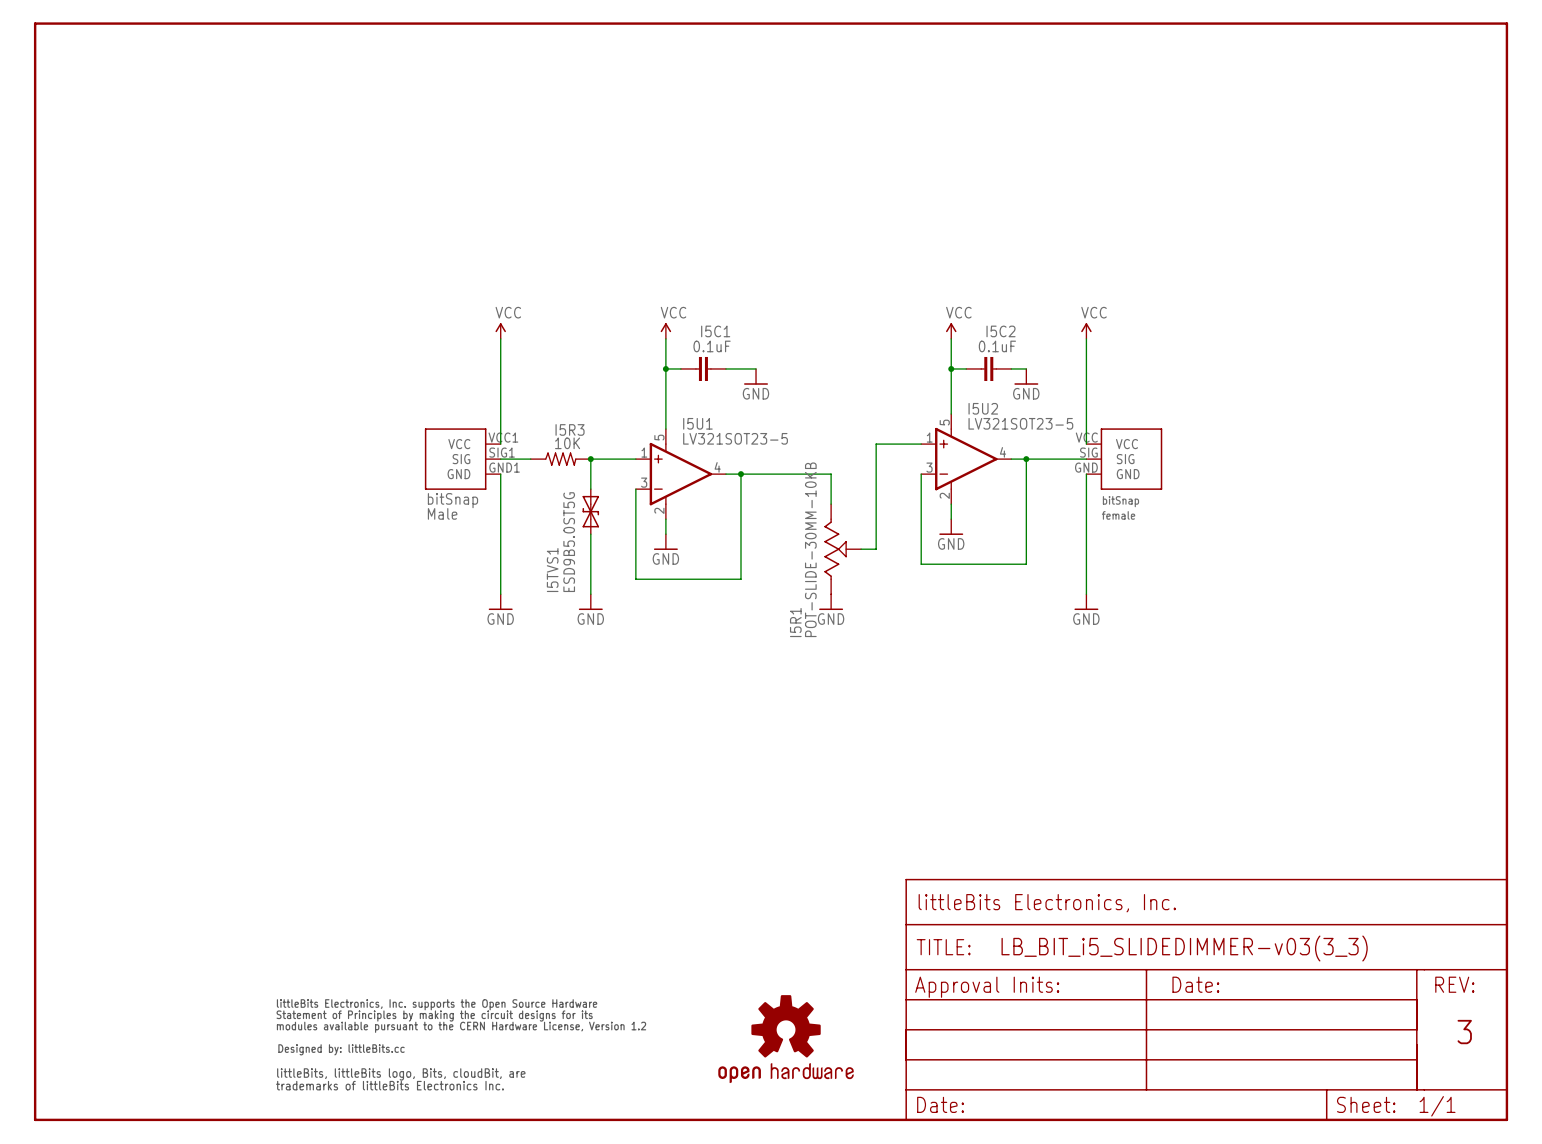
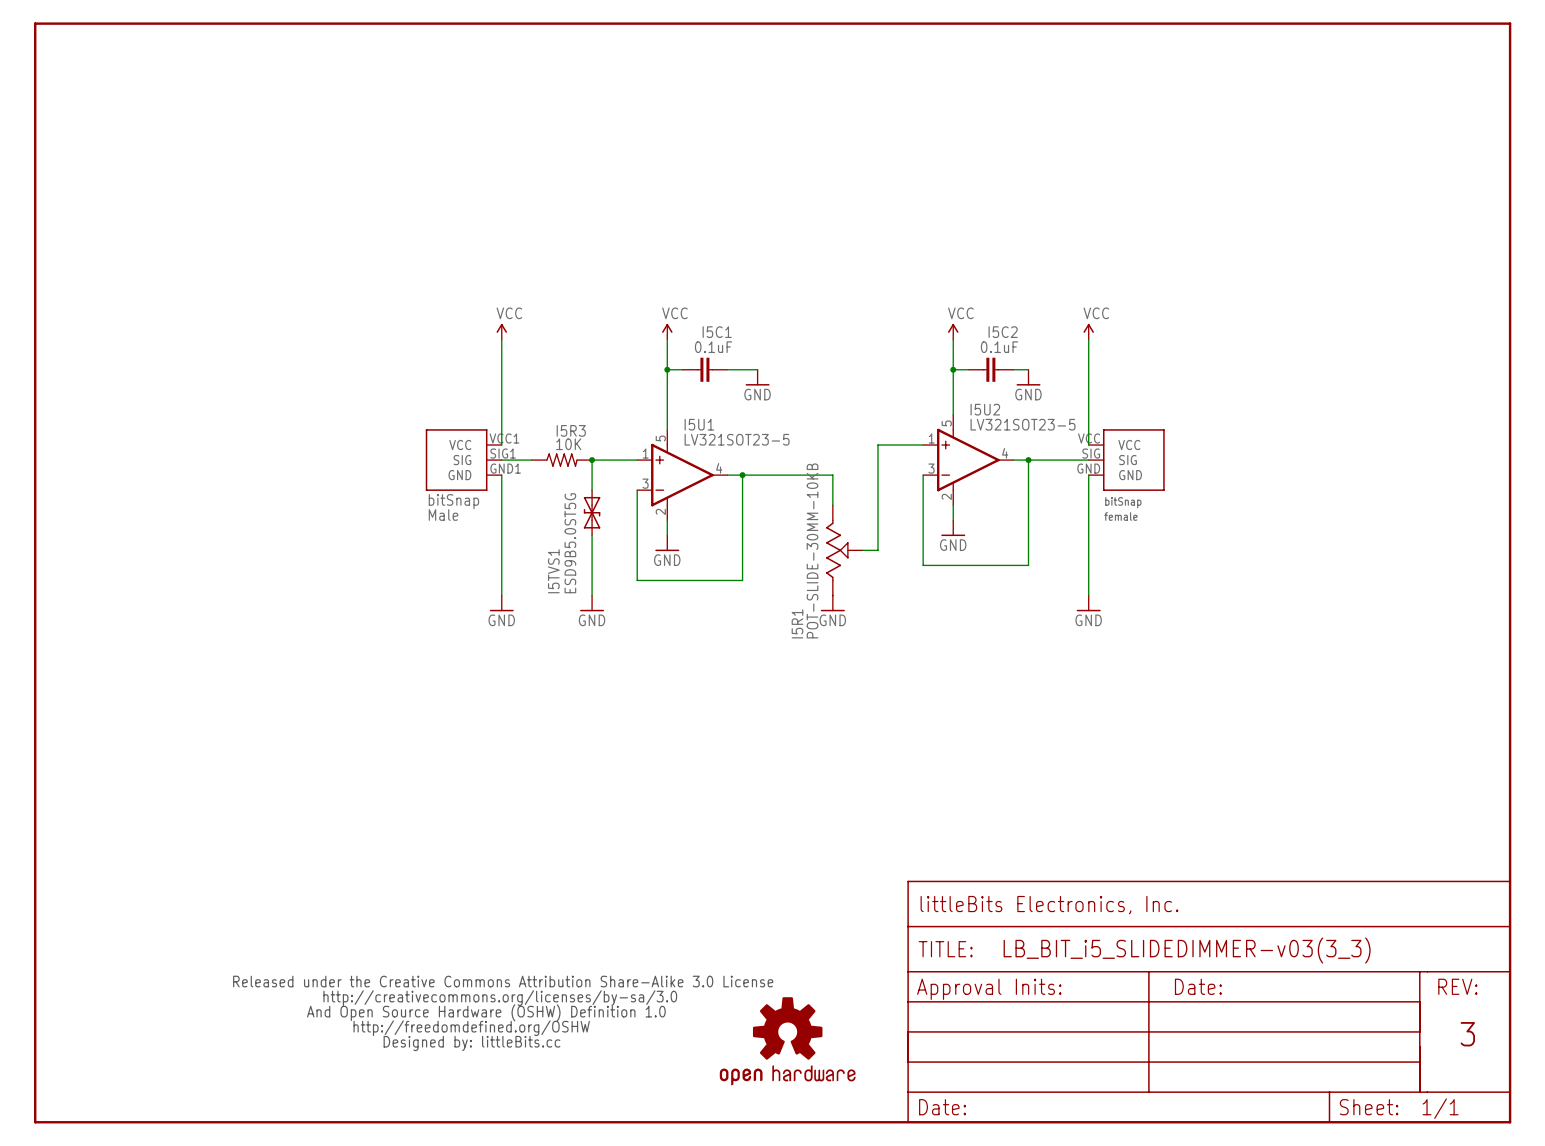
part: none -> (503, 1013)
part: (461, 1044) -> none

